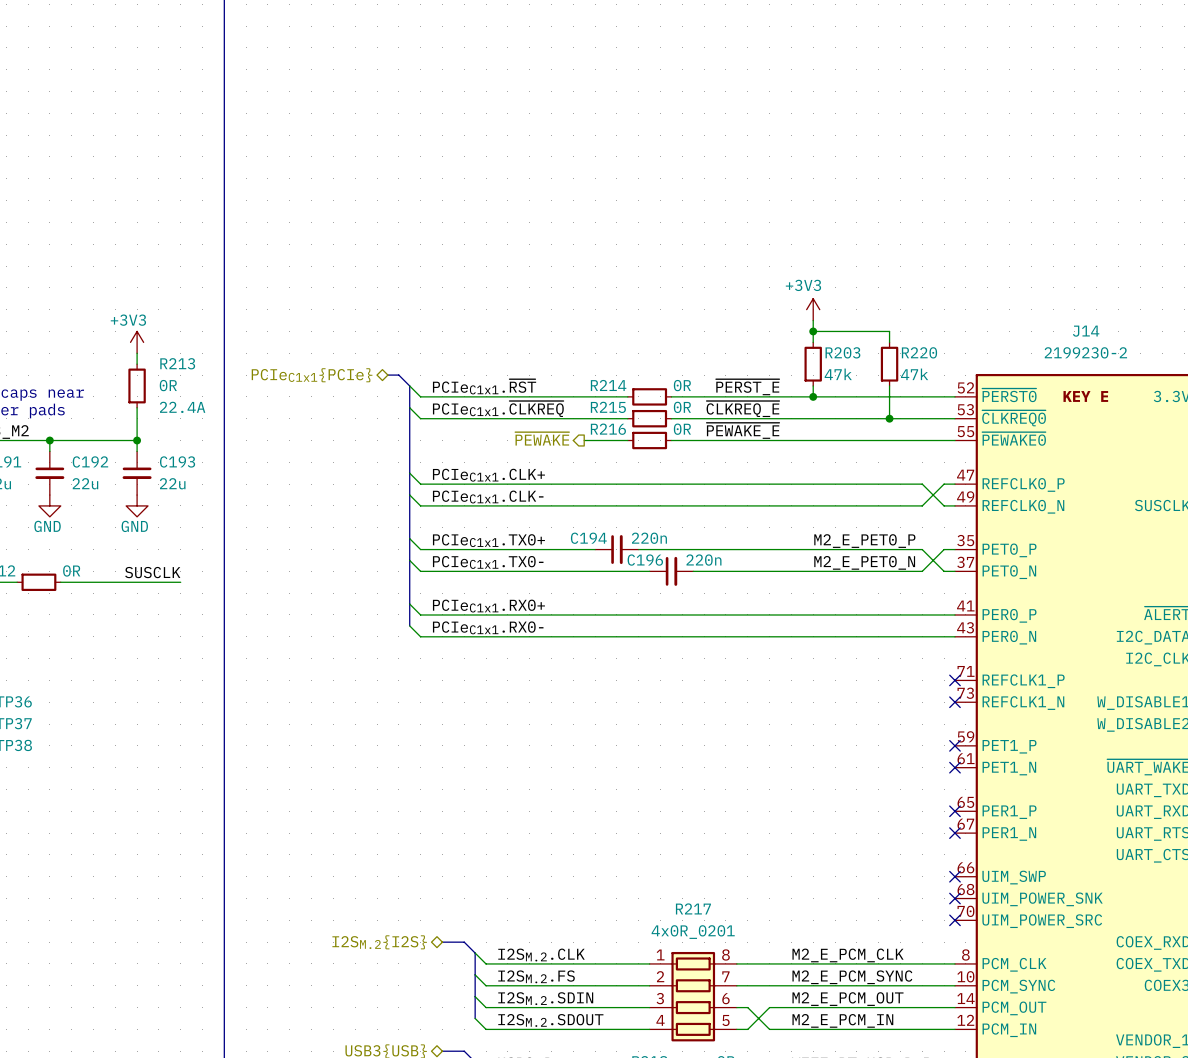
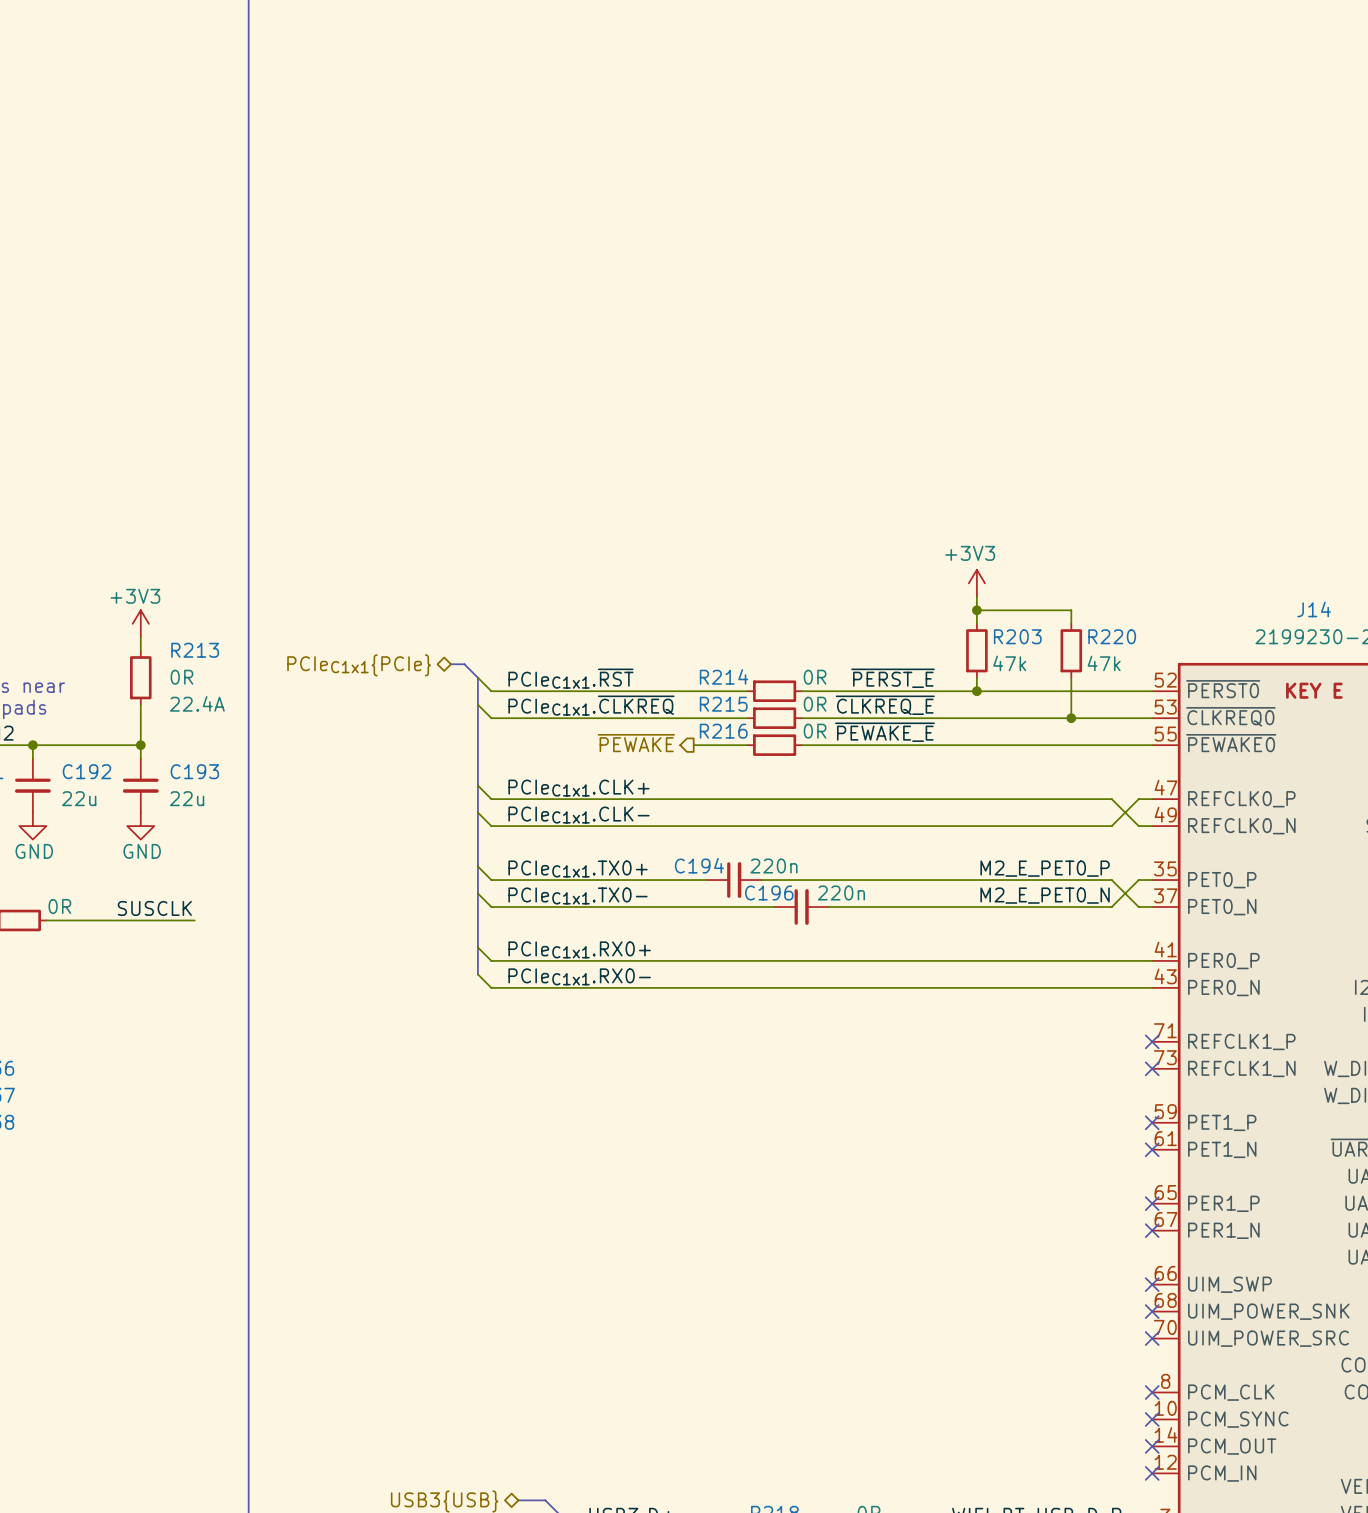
hierarchical label: I2SM.2{I2S} (379, 942) -> none
bus: (442, 942) (464, 942) (475, 953) (475, 1018) -> none
wire: (475, 953) (486, 963) (649, 963) -> none
label: I2SM.2.CLK (541, 955) -> none
label: M2_E_PCM_CLK (848, 955) -> none
wire: (736, 963) (954, 963) -> none
no-connect mark: none -> (1152, 1392)
wire: (475, 974) (486, 985) (649, 985) -> none
label: I2SM.2.FS (536, 976) -> none
label: M2_E_PCM_SYNC (852, 977) -> none
wire: (736, 985) (954, 985) -> none
no-connect mark: none -> (1152, 1419)
wire: (475, 996) (486, 1007) (649, 1007) -> none
R217: (693, 996) -> none
label: I2SM.2.SDIN (545, 998) -> none
label: M2_E_PCM_OUT (847, 999) -> none
wire: (736, 1007) (747, 1007) (769, 1029) (954, 1029) -> none
wire: (954, 1007) (769, 1007) (747, 1029) (736, 1029) -> none
no-connect mark: none -> (1152, 1446)
wire: (475, 1018) (486, 1029) (649, 1029) -> none
label: I2SM.2.SDOUT (550, 1020) -> none
label: M2_E_PCM_IN (842, 1020) -> none
no-connect mark: none -> (1152, 1473)

